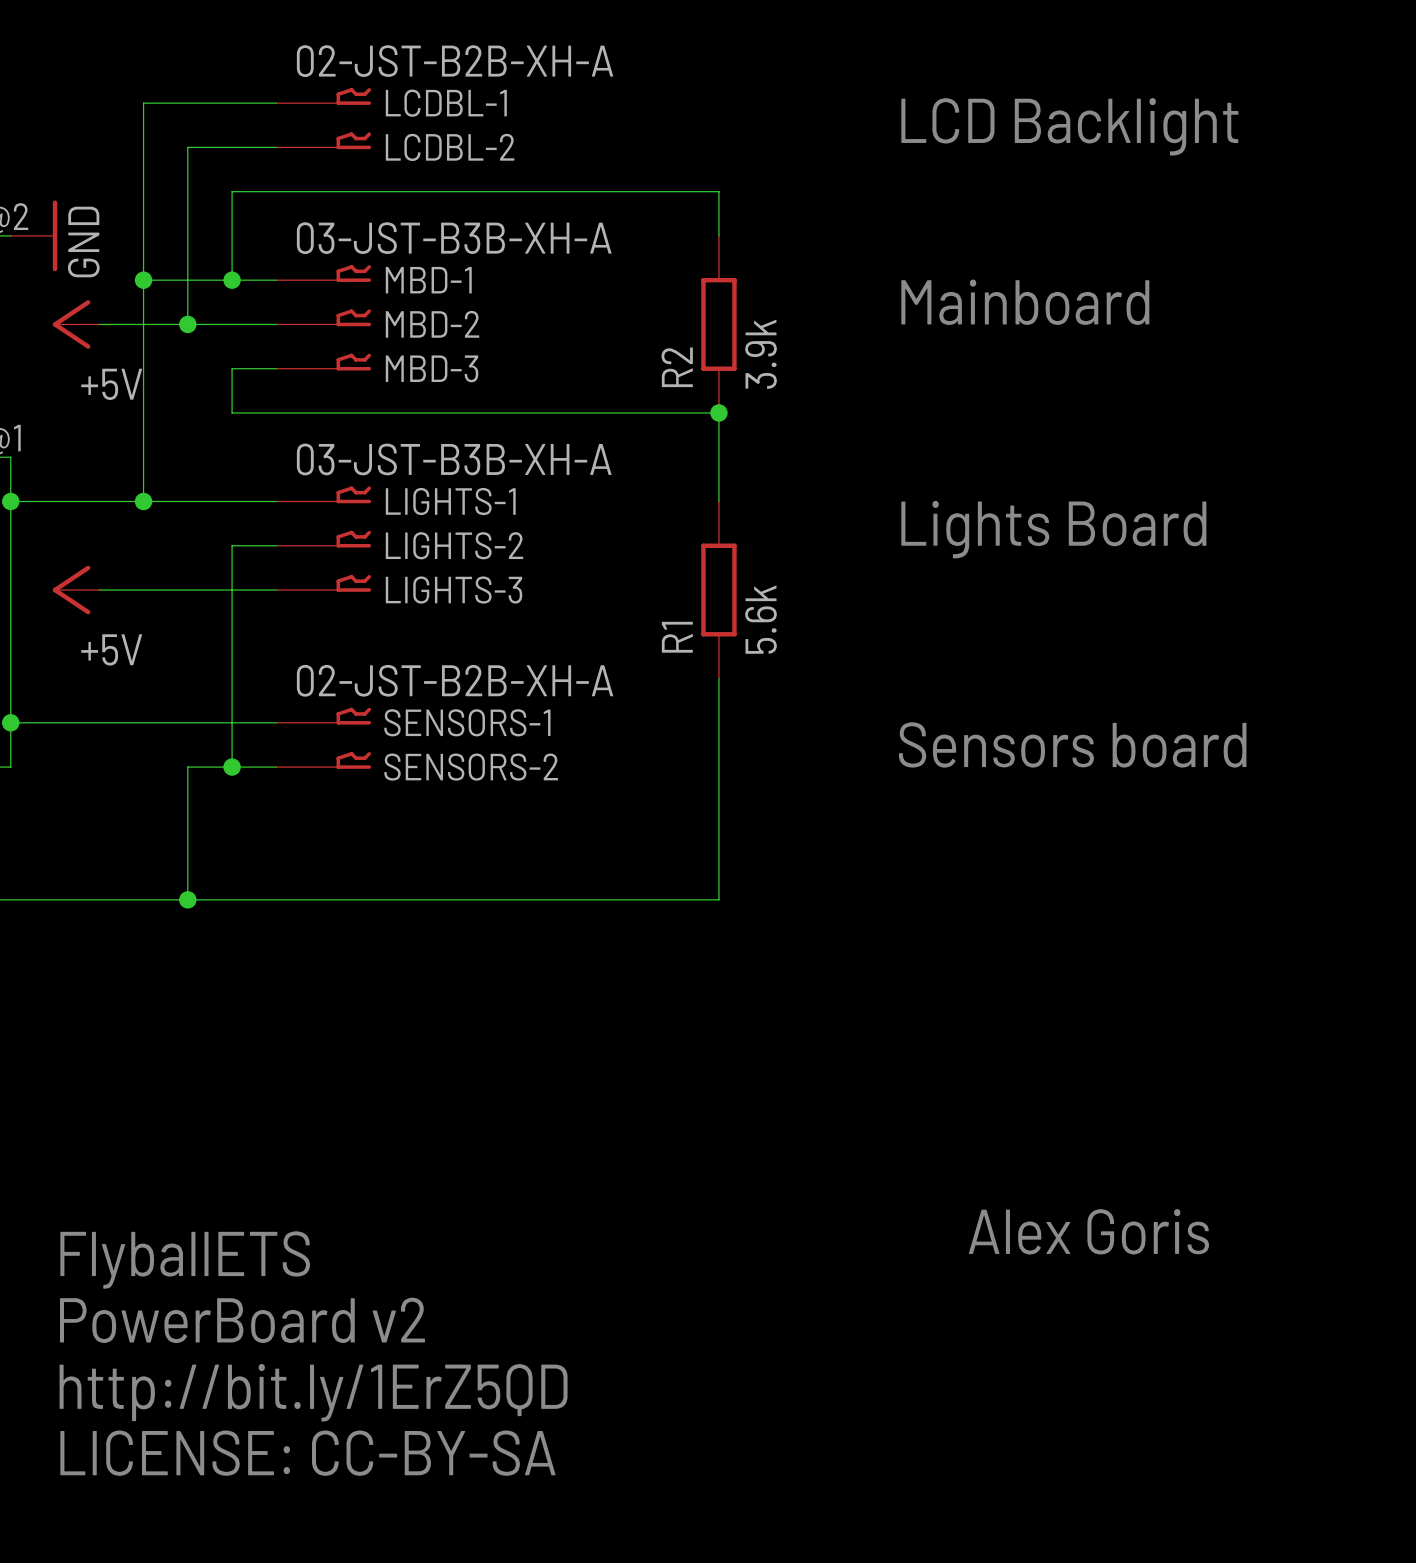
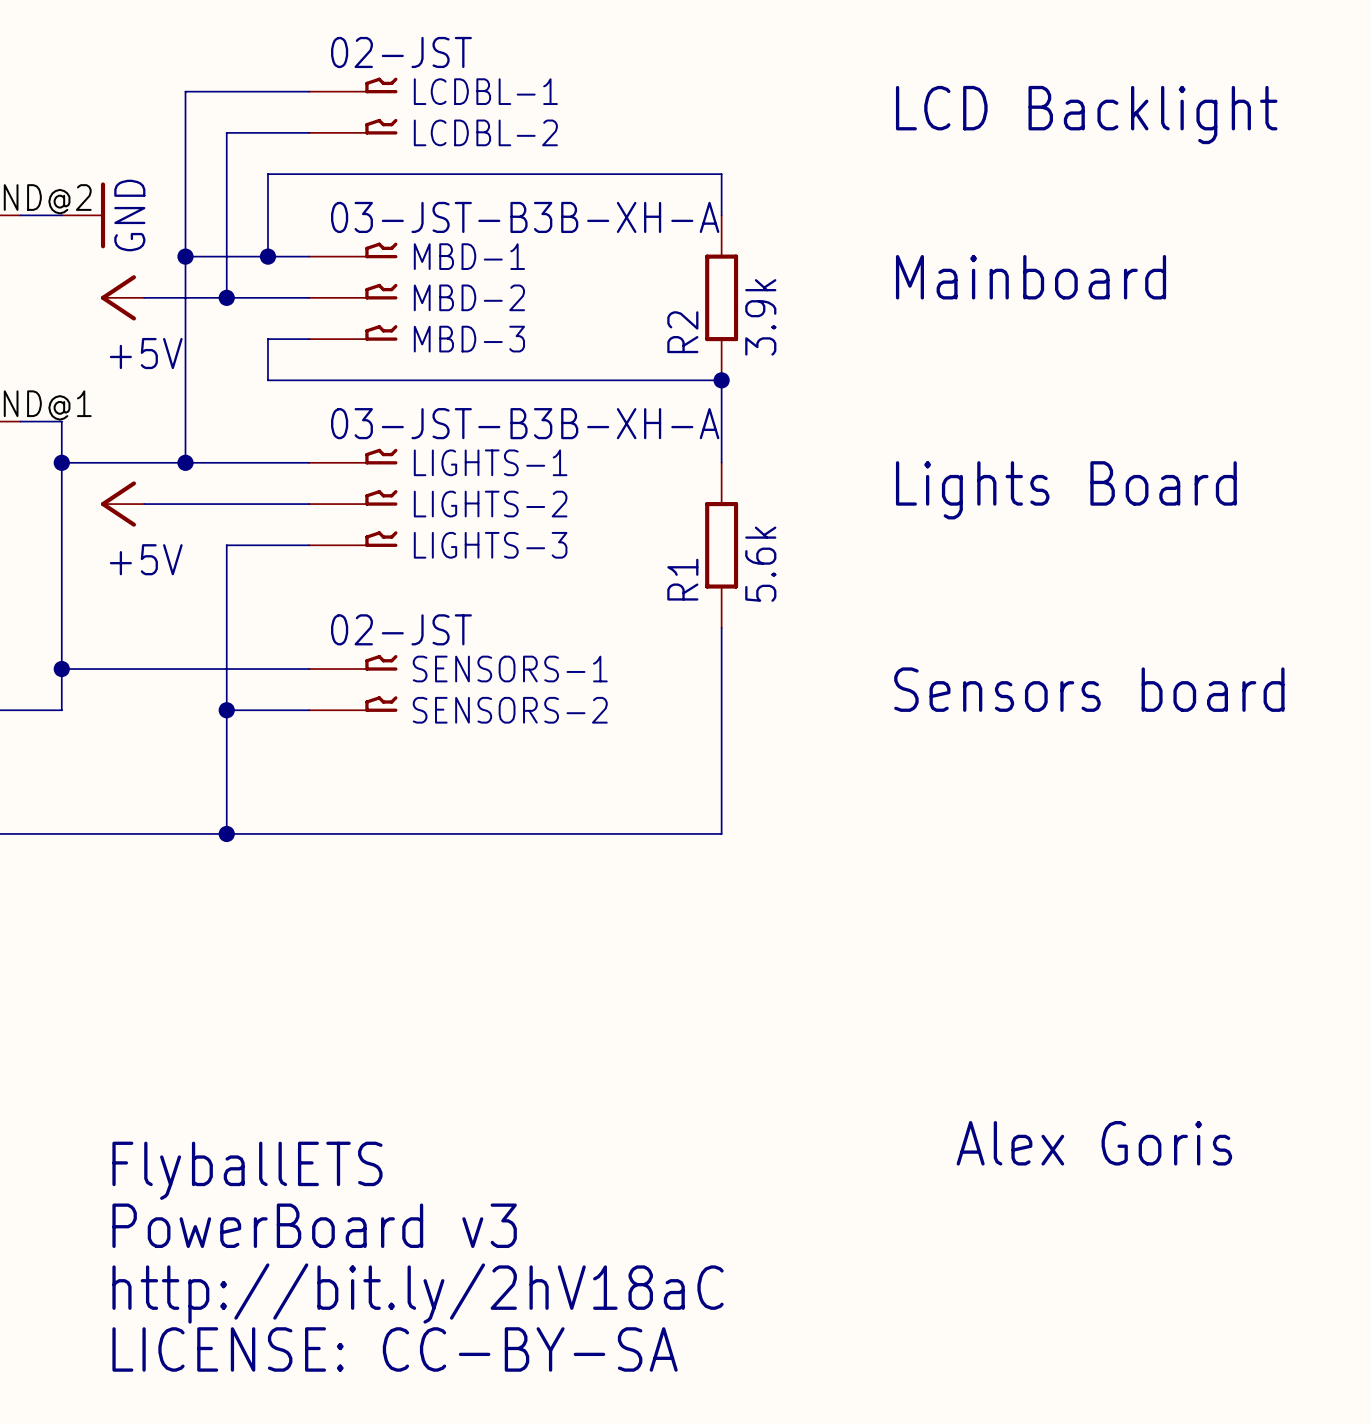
LCDBL-1 value: 02-JST-B2B-XH-A (455, 61) -> 02-JST (401, 52)
wire: (232, 545) (232, 767) -> (267, 504) (144, 504)
power symbol position: +5V (76, 590) -> +5V (122, 504)
wire: (99, 590) (187, 590) -> (226, 710) (226, 545)
SENSORS-1 value: 02-JST-B2B-XH-A (455, 680) -> 02-JST (401, 629)
junction position: (232, 767) -> (226, 710)
text: PowerBoard v2 (242, 1320) -> PowerBoard v3 (314, 1225)
text: http://bit.ly/1ErZ5QD (313, 1392) -> http://bit.ly/2hV18aC (418, 1293)

